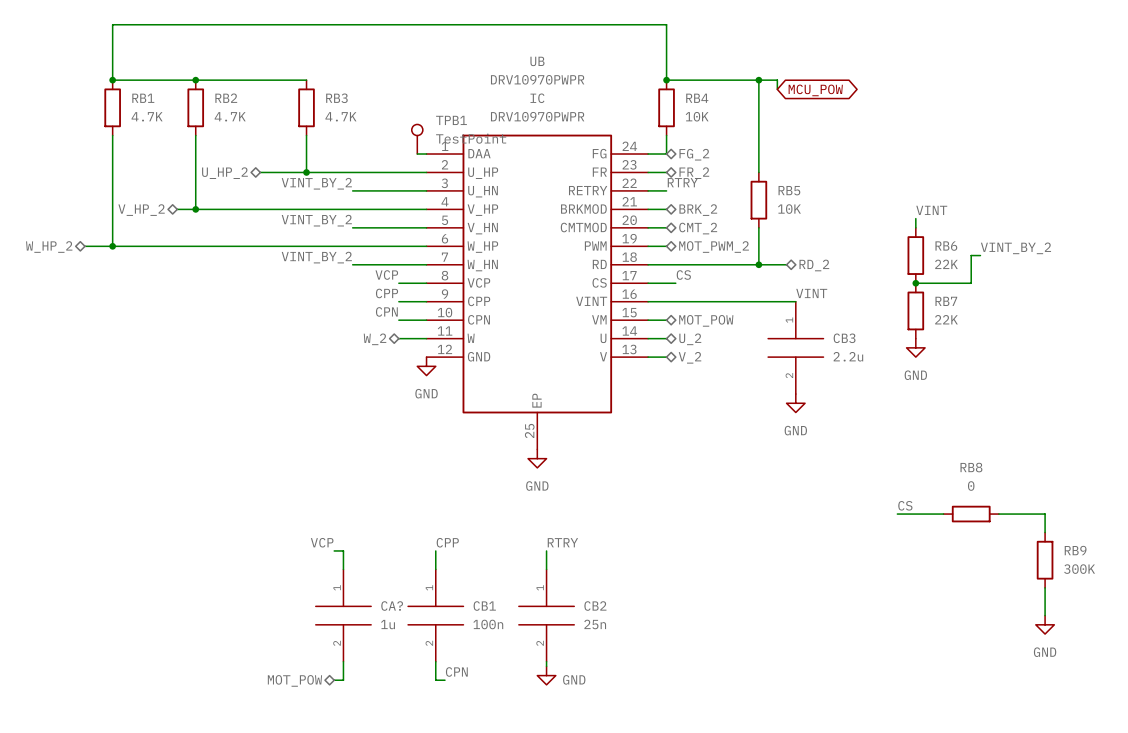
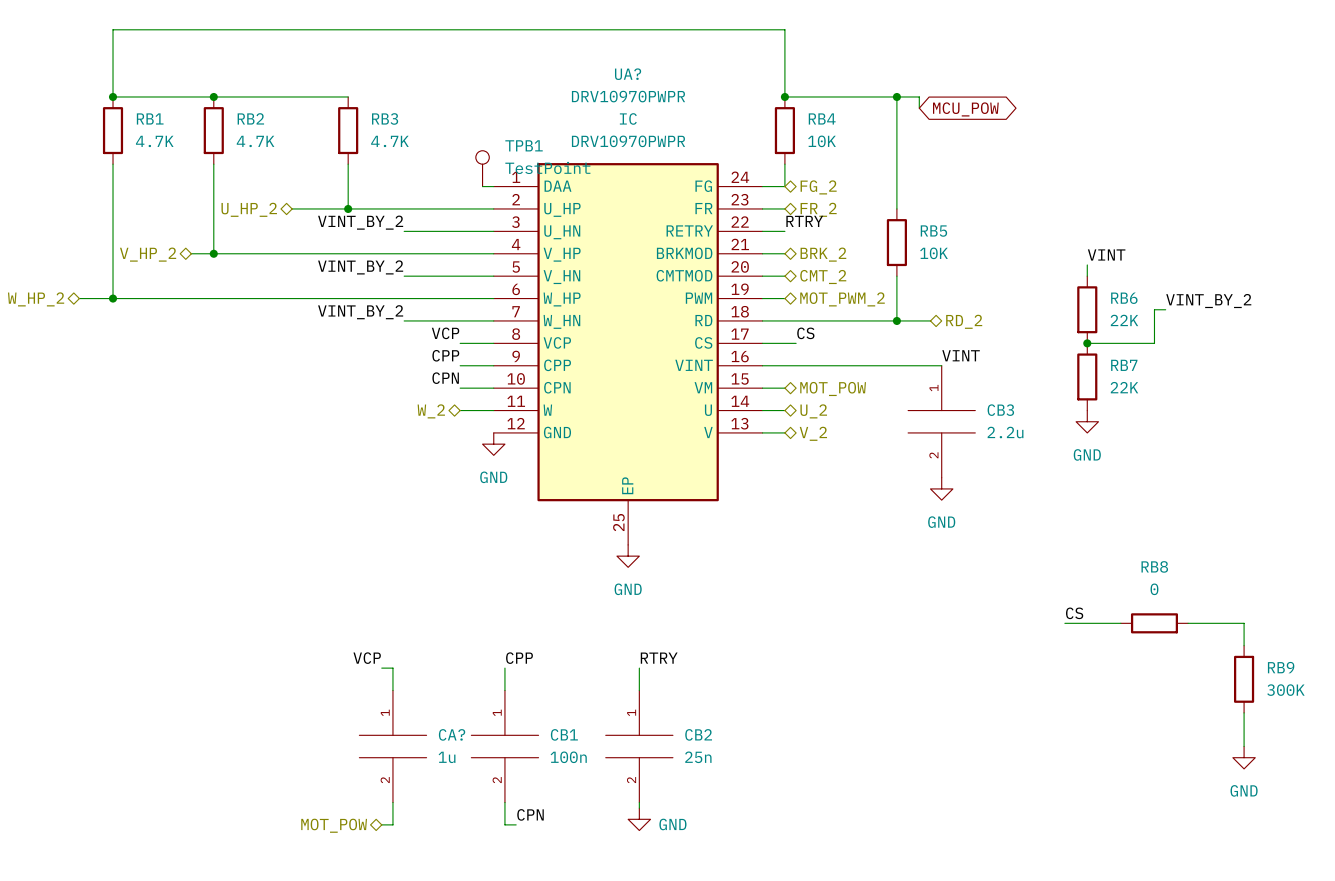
UB name: UB (537, 61) -> UA? (628, 74)

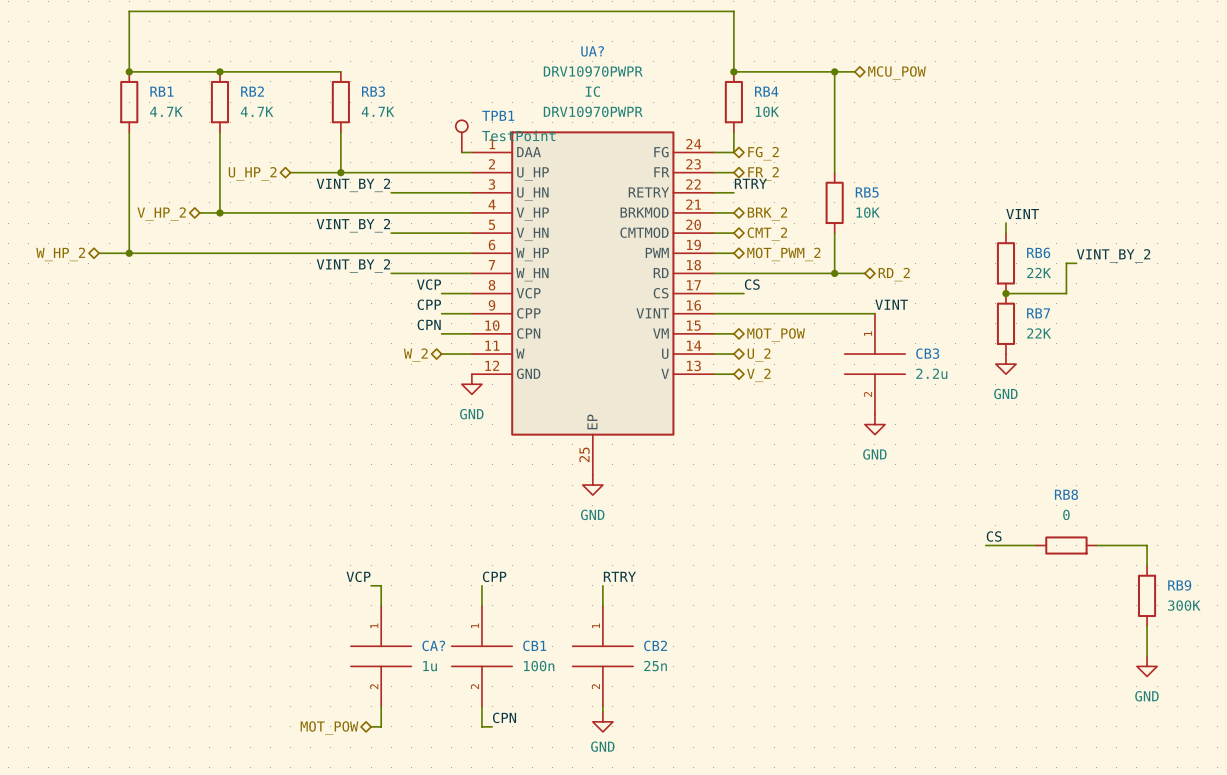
wire: (919, 96) (919, 108) -> none
hierarchical label: none -> MCU_POW (897, 73)
global label: MCU_POW (965, 109) -> none
power symbol text position: GND (672, 824) -> GND (602, 746)

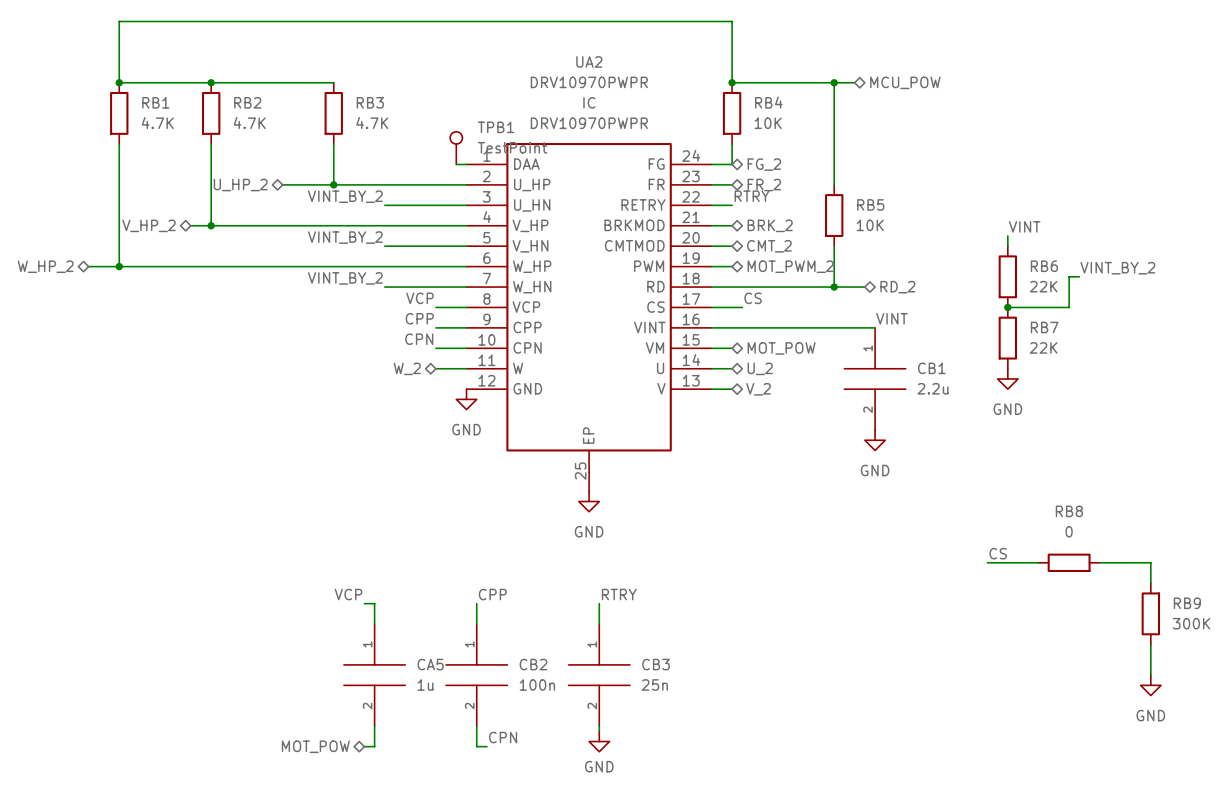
UA? name: UA? (592, 51) -> UA2 (589, 61)
CB3 name: CB3 (927, 353) -> CB1 (931, 368)
CA? name: CA? (433, 645) -> CA5 (430, 664)
CB1 name: CB1 (534, 645) -> CB2 (533, 664)
CB2 name: CB2 (655, 645) -> CB3 (656, 664)

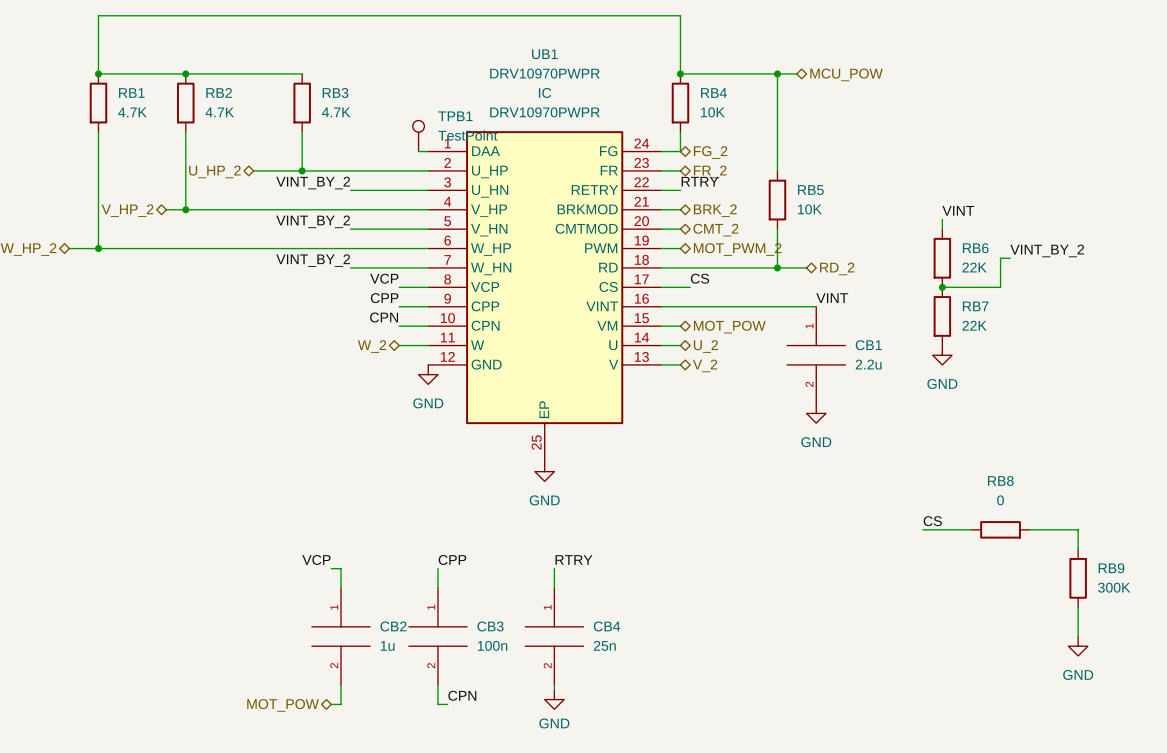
UA2 name: UA2 (589, 61) -> UB1 (544, 54)
CA5 name: CA5 (430, 664) -> CB2 (393, 626)
CB2 name: CB2 (533, 664) -> CB3 (490, 626)
CB3 name: CB3 (656, 664) -> CB4 (607, 626)

